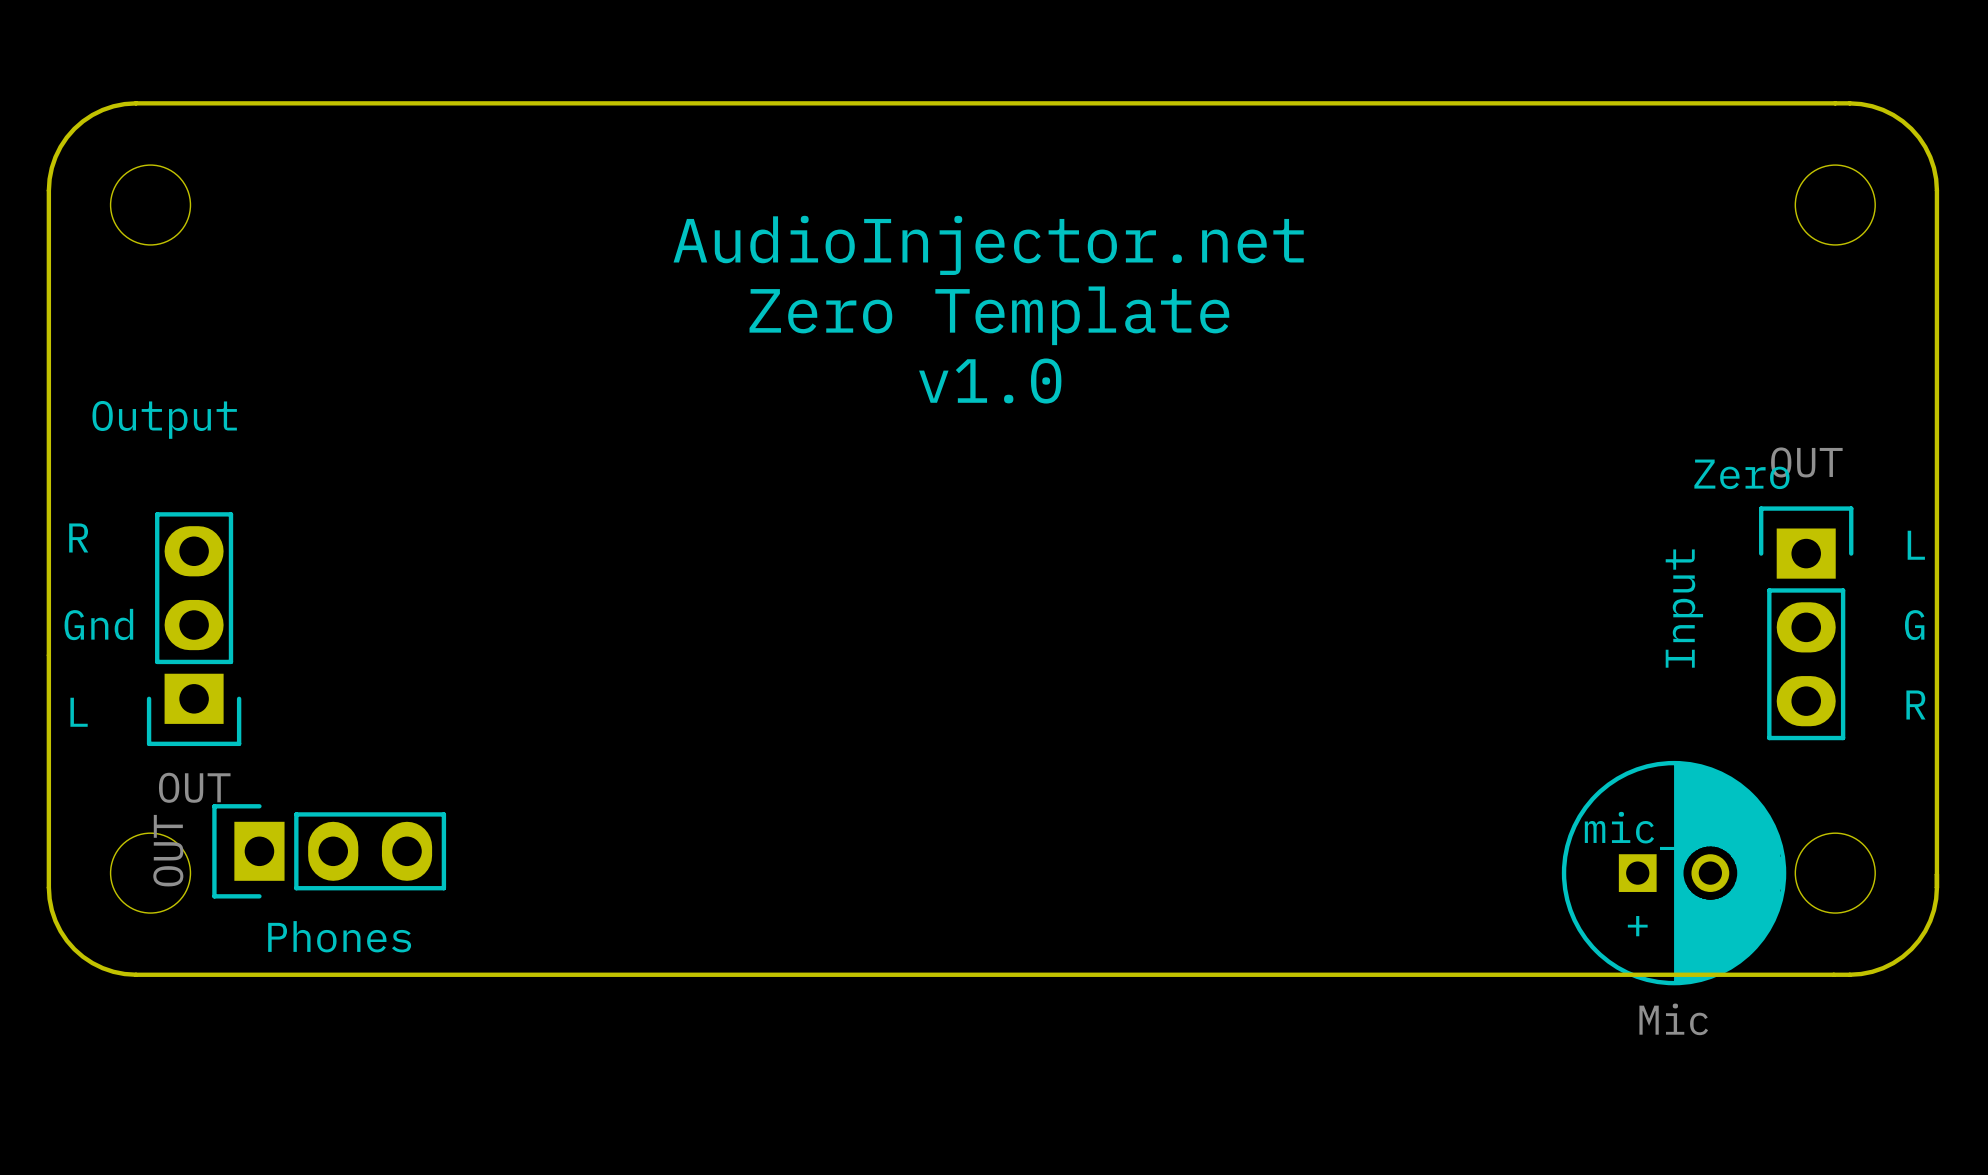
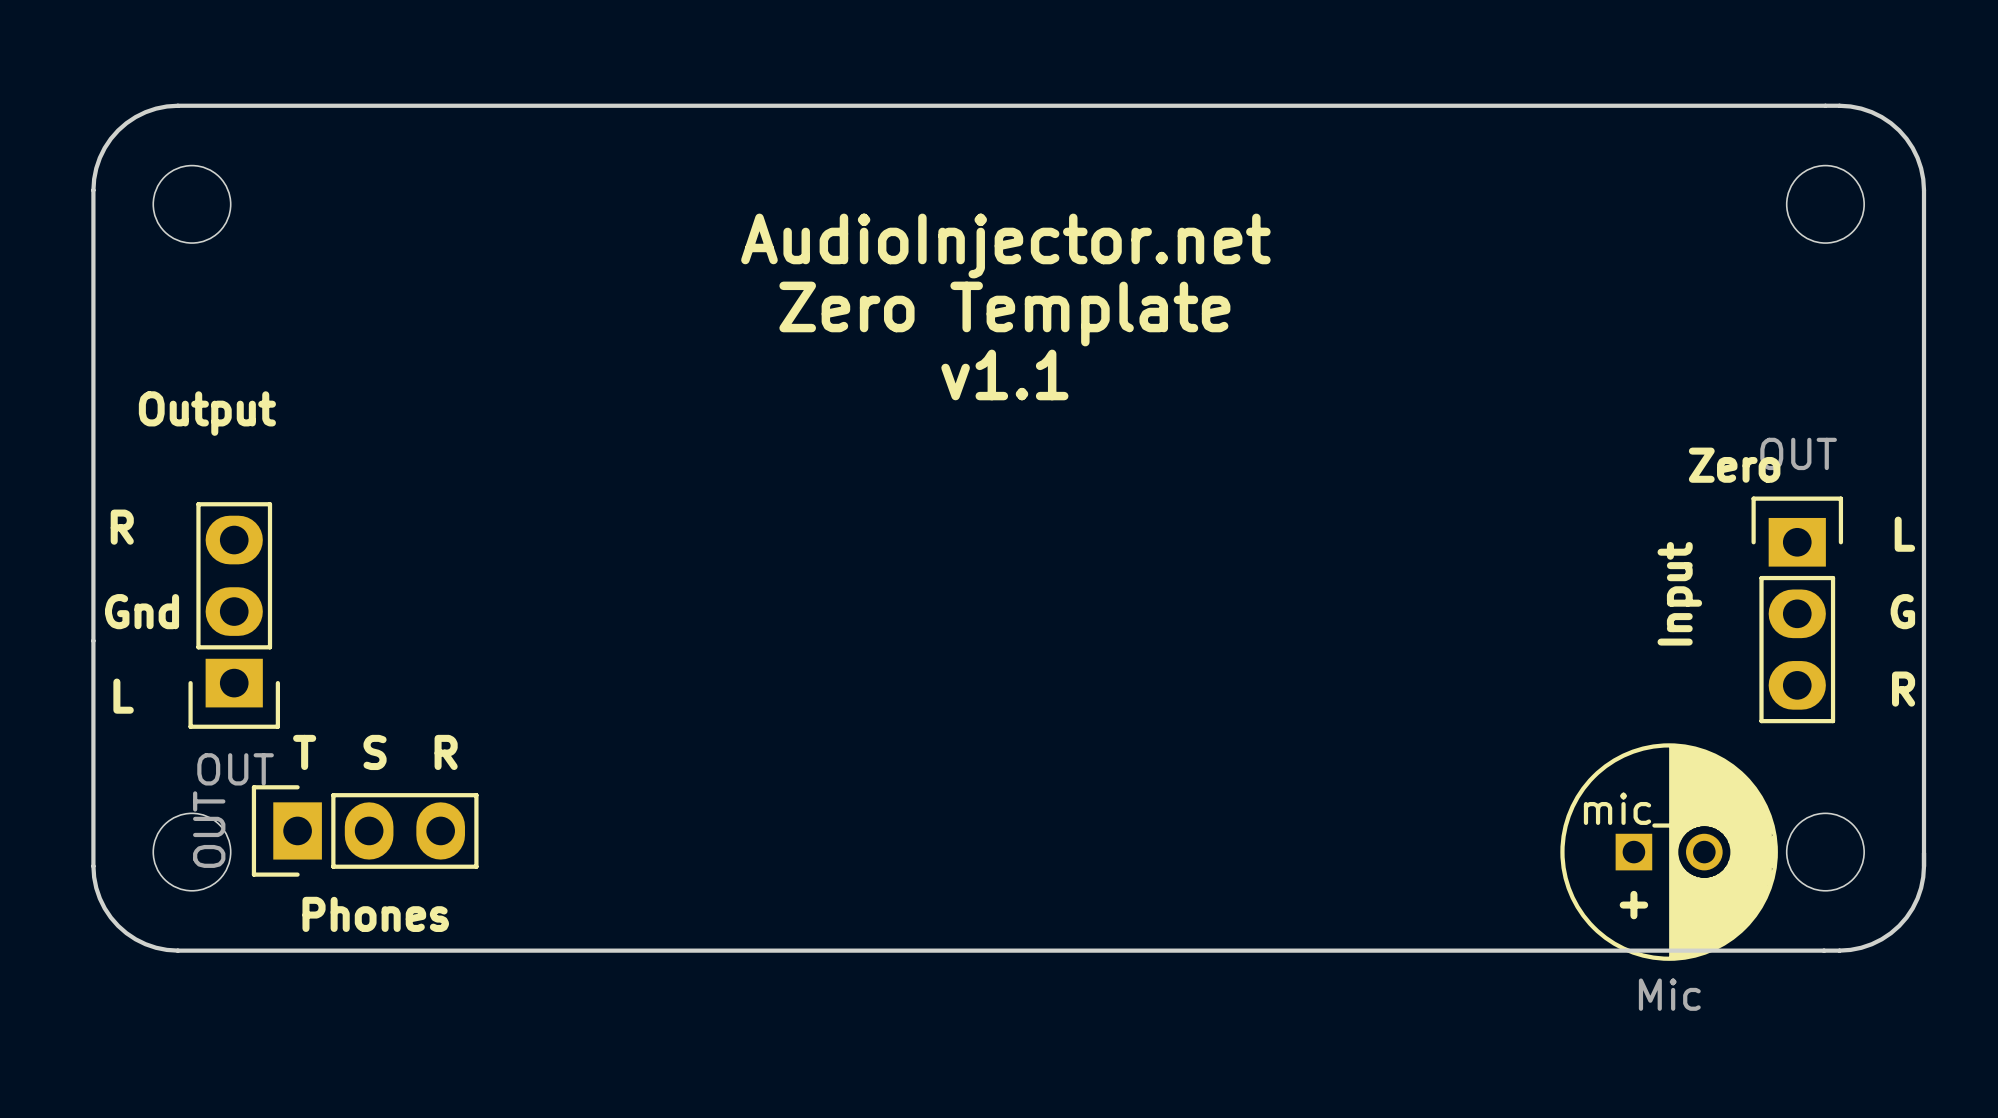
text: v1.0 (990, 381) -> v1.1 (1004, 374)
text: none -> T (304, 752)
text: none -> S (375, 752)
text: none -> R (446, 752)

